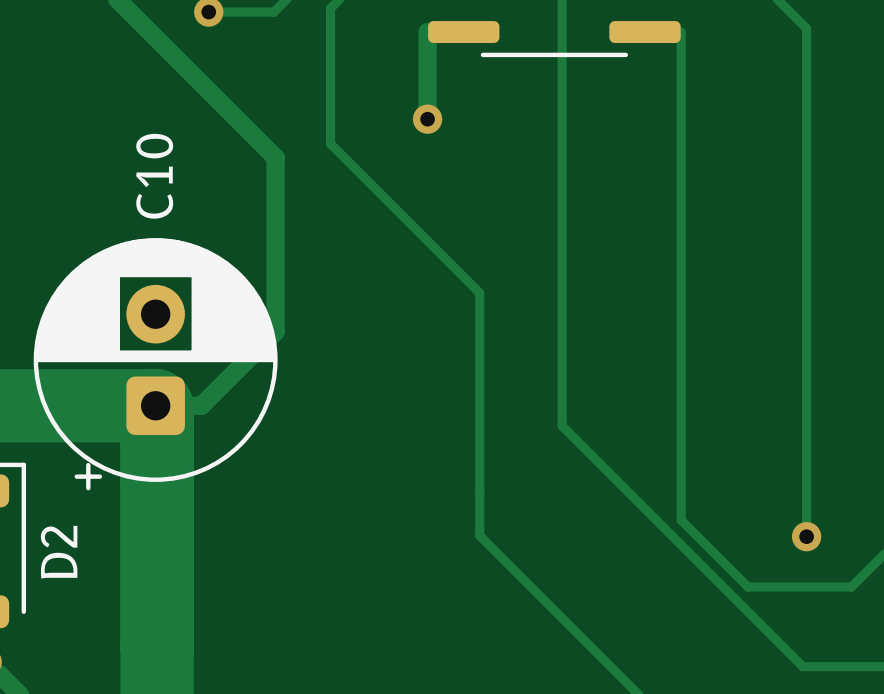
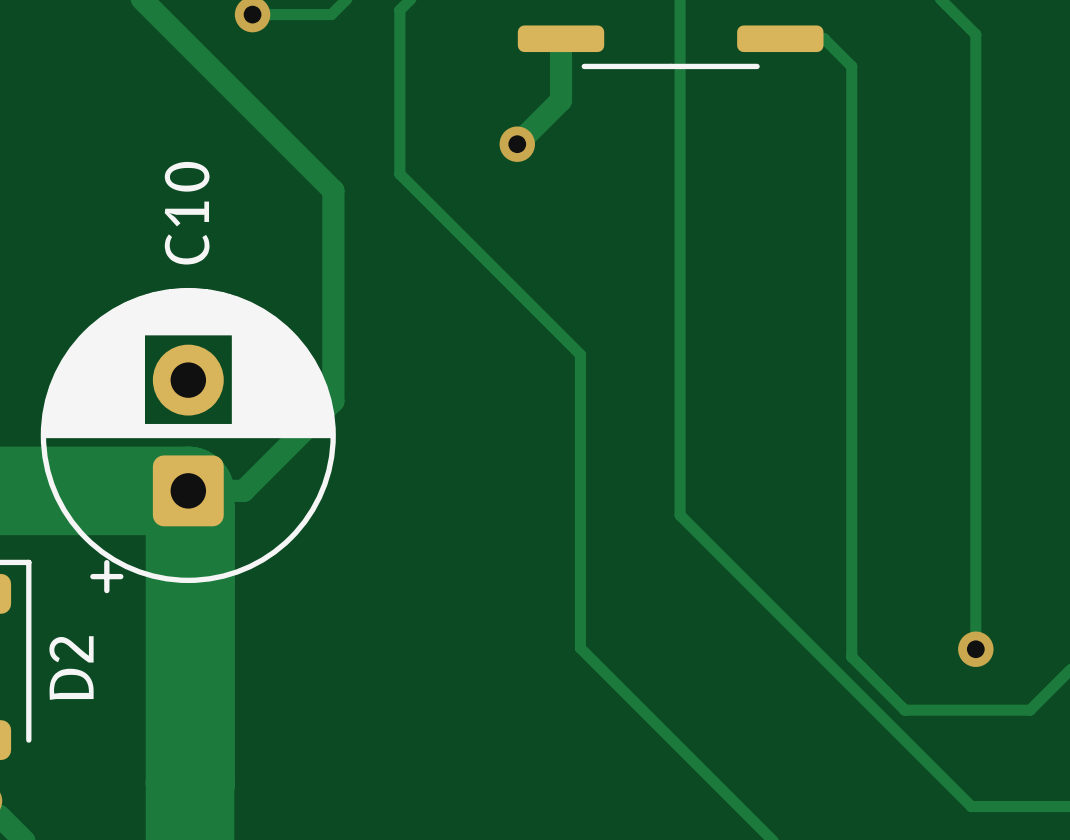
track: (427, 32) (427, 119) -> (561, 38) (561, 100) (517, 144)
track: (681, 32) (681, 520) (704, 543) -> (780, 38) (824, 38) (851, 66) (851, 657)

